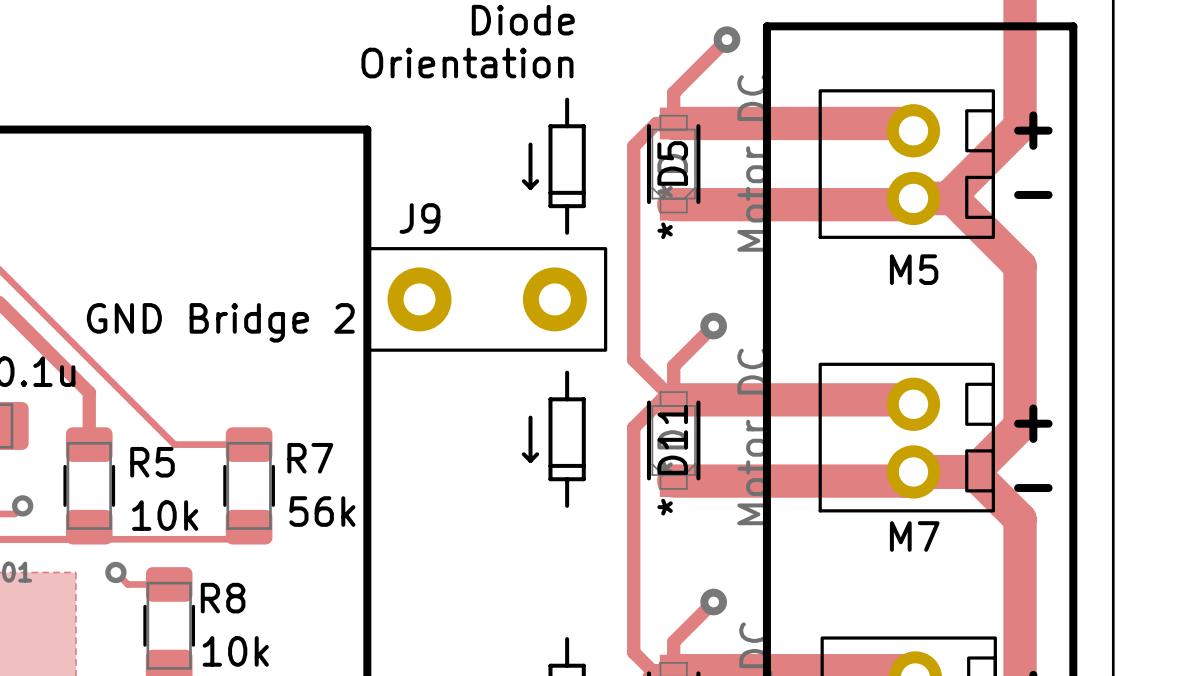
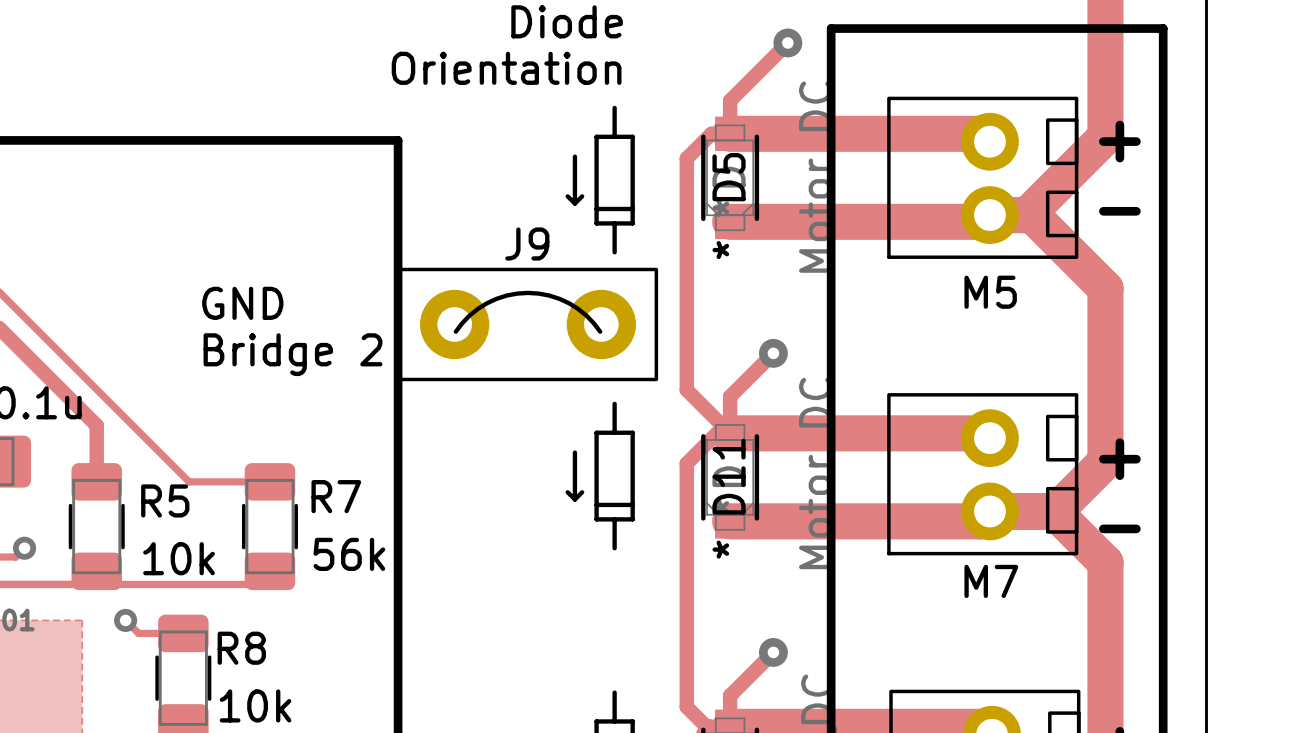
J9 name position: J9 (419, 218) -> J9 (527, 244)
text: none -> GND (242, 303)
line: none -> (455, 331) (469, 315) (487, 303) (506, 295) (528, 292) (549, 295) (568, 303) (586, 315) (600, 331)
J9 value: GND Bridge 2 (220, 322) -> none
text: none -> Bridge 2 (293, 354)

